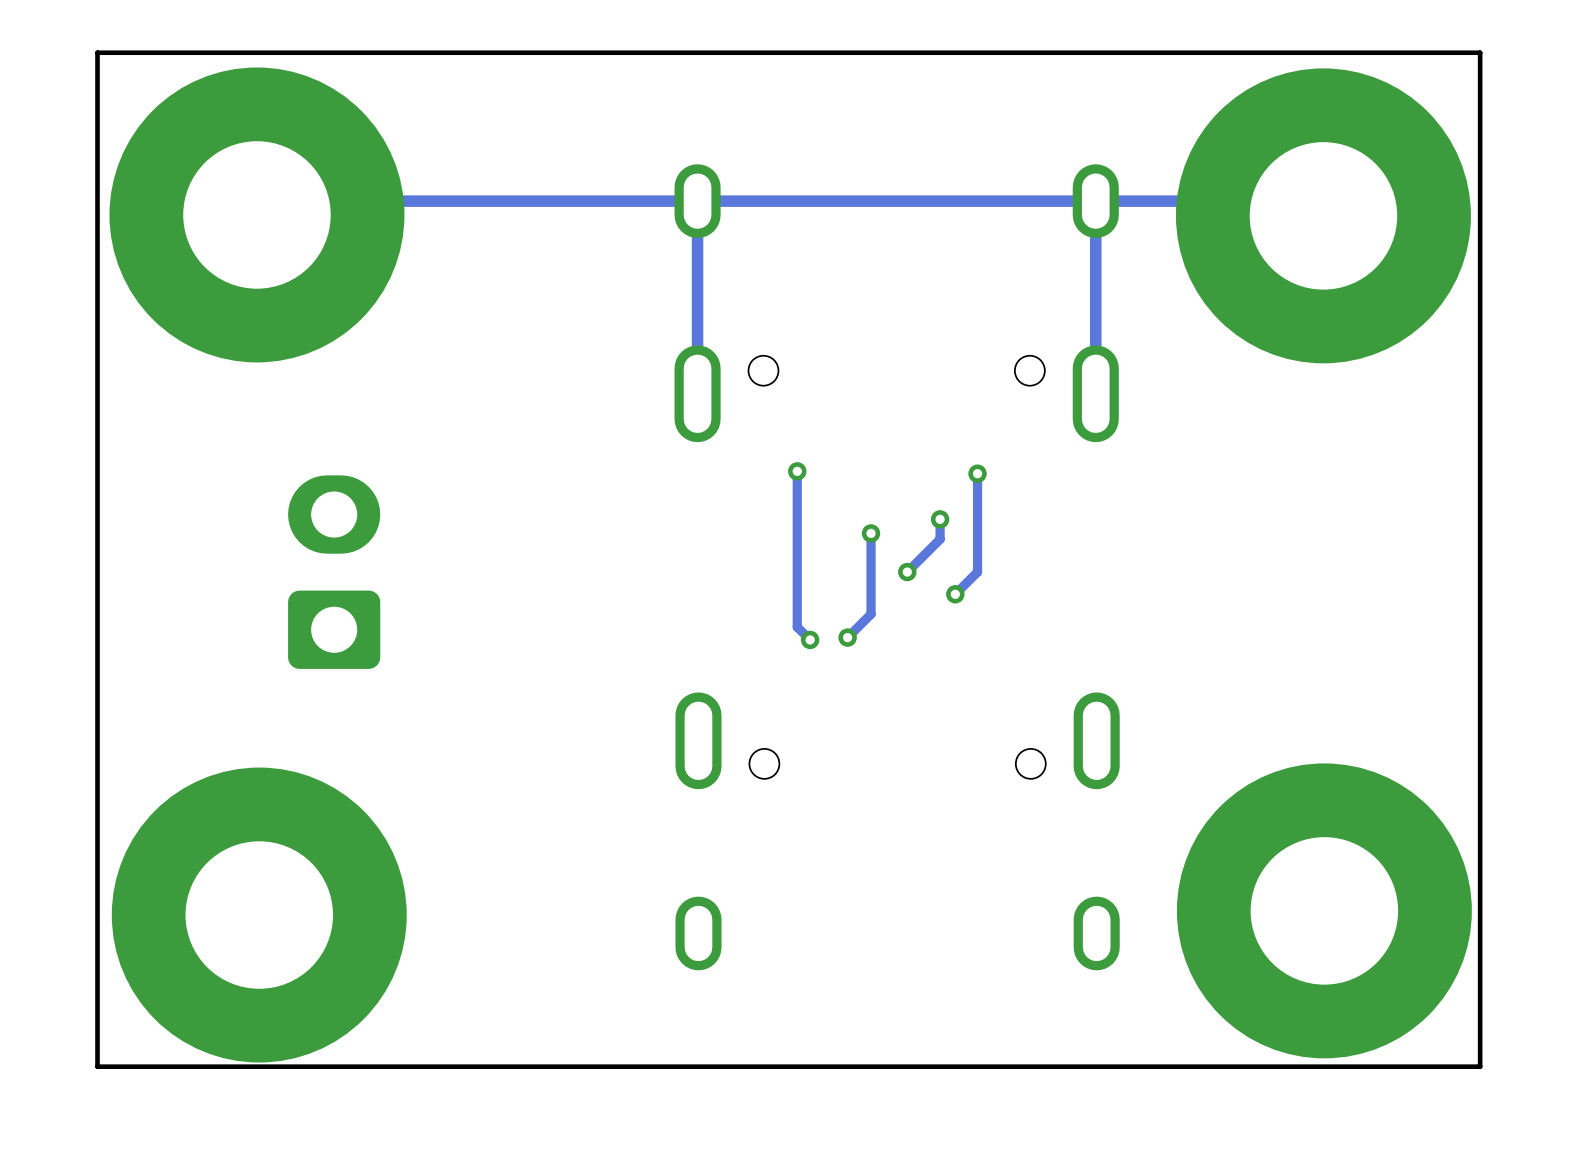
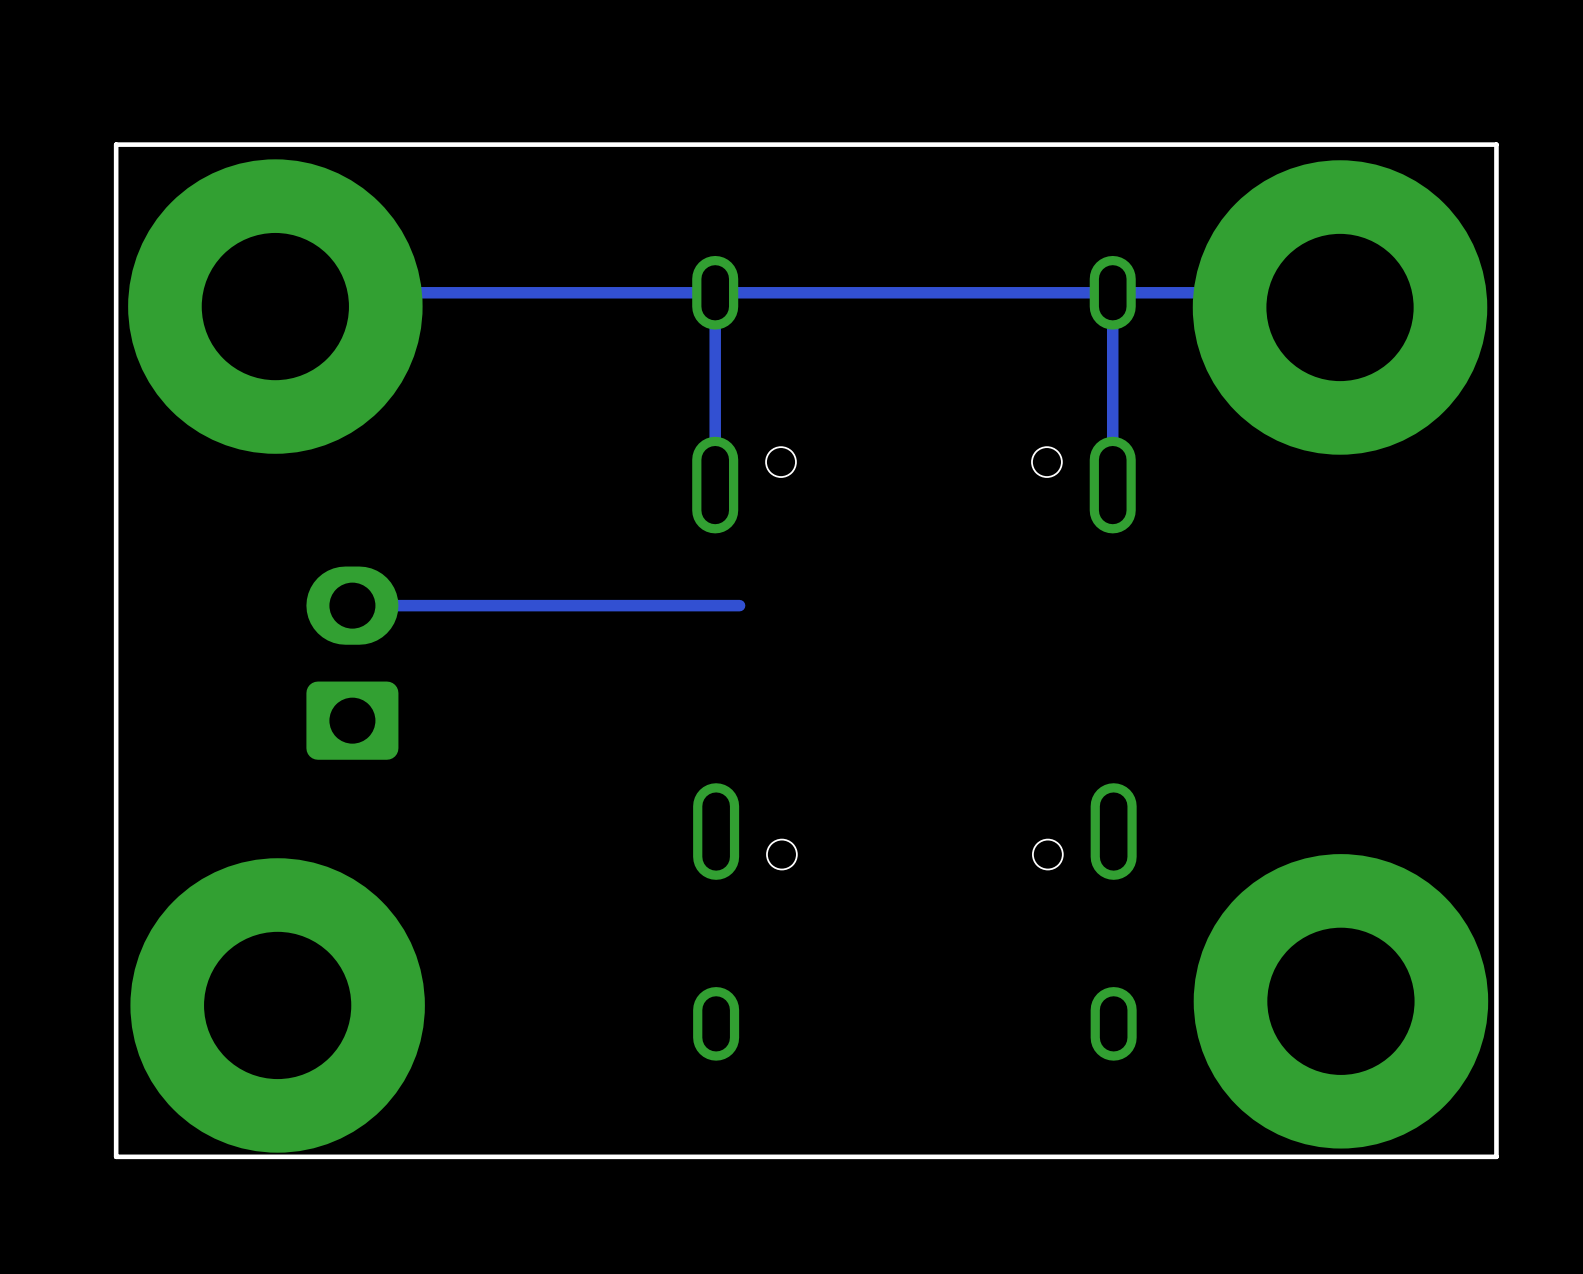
track: (797, 471) (797, 627) (810, 639) -> none
via: (797, 471) -> none
track: (977, 473) (977, 572) (955, 594) -> none
via: (977, 473) -> none
track: none -> (739, 605) (352, 605)
track: (940, 519) (940, 539) (907, 572) -> none
via: (940, 519) -> none
track: (871, 533) (871, 614) (847, 637) -> none
via: (871, 533) -> none
via: (907, 572) -> none
via: (955, 594) -> none
via: (847, 637) -> none
via: (810, 639) -> none

